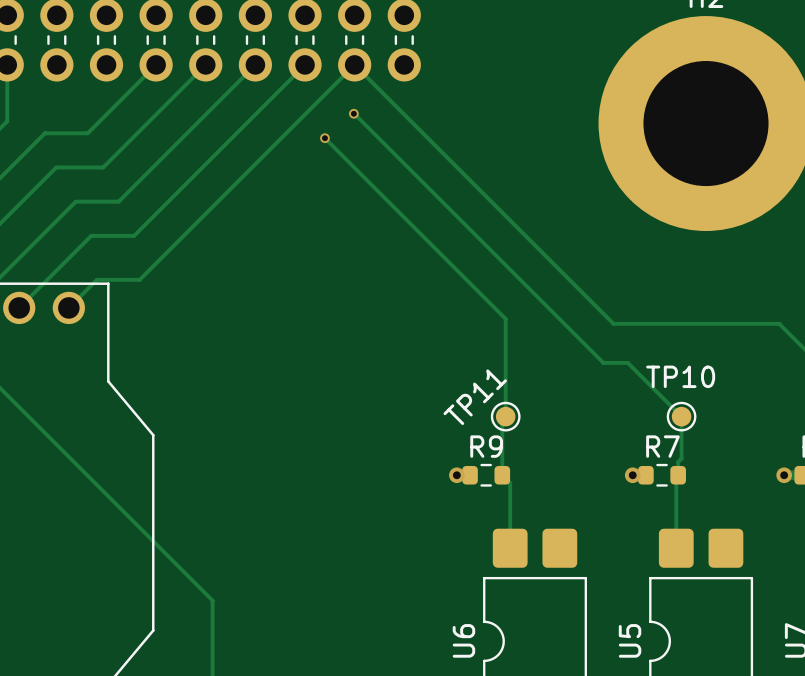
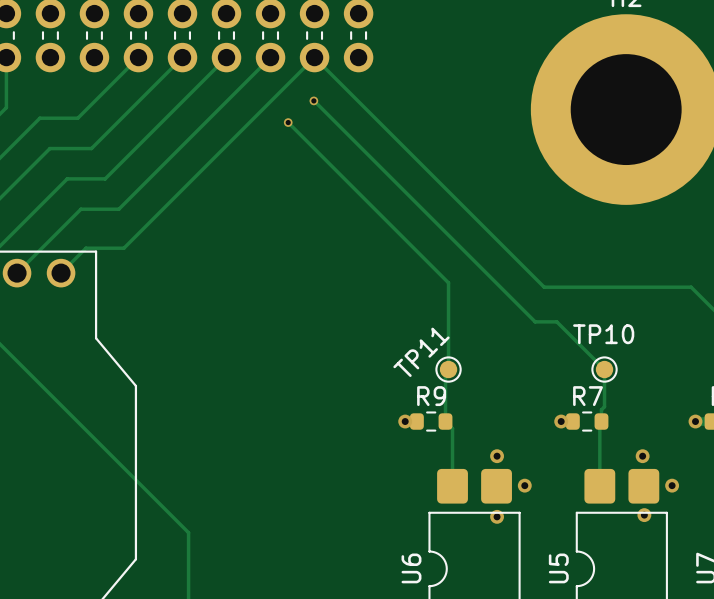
via: none -> (497, 456)
via: none -> (642, 456)
via: none -> (524, 485)
via: none -> (672, 485)
via: none -> (644, 515)
via: none -> (497, 516)

